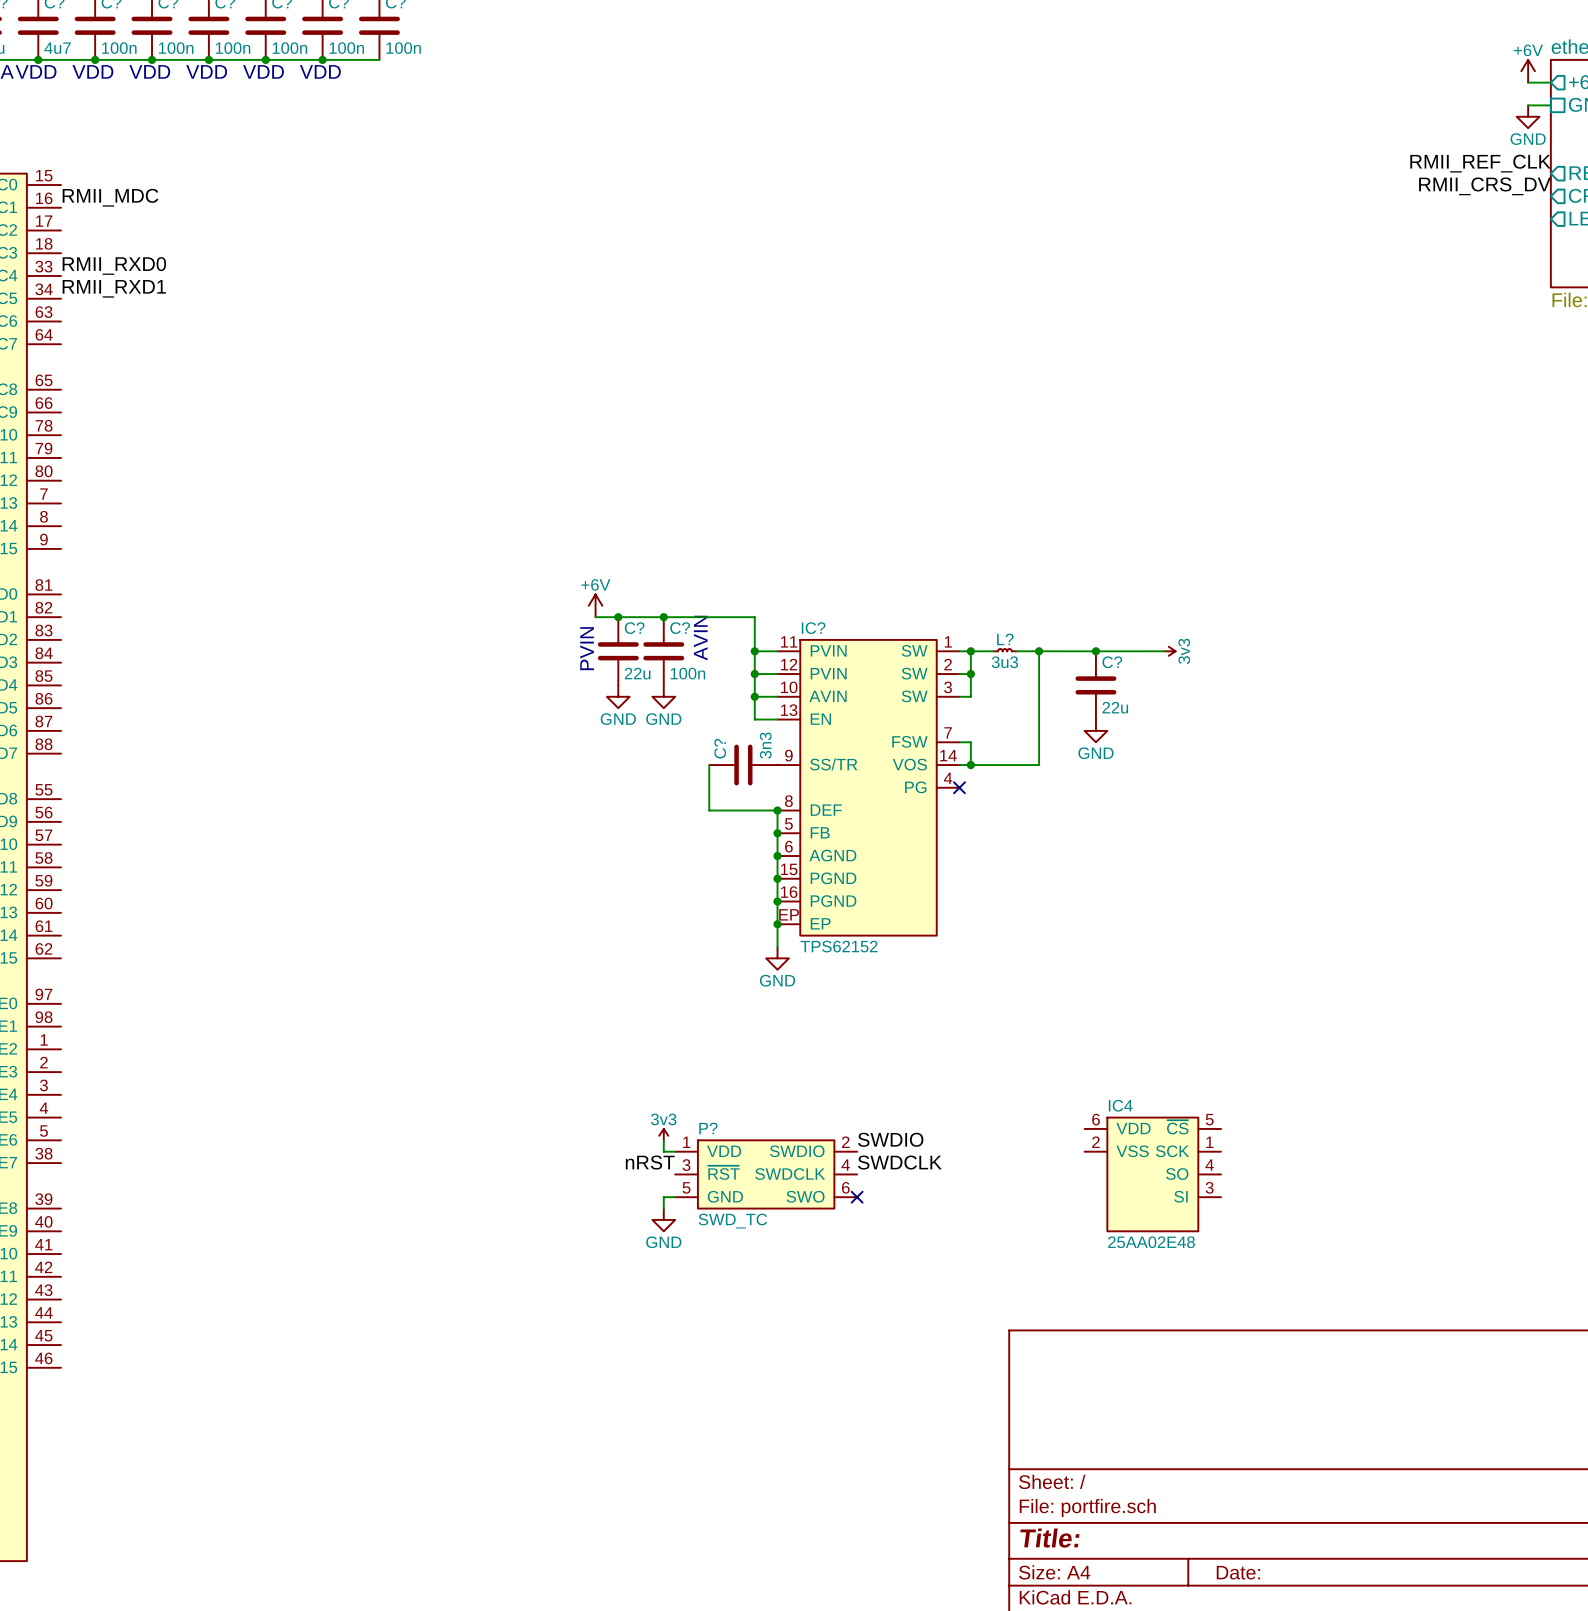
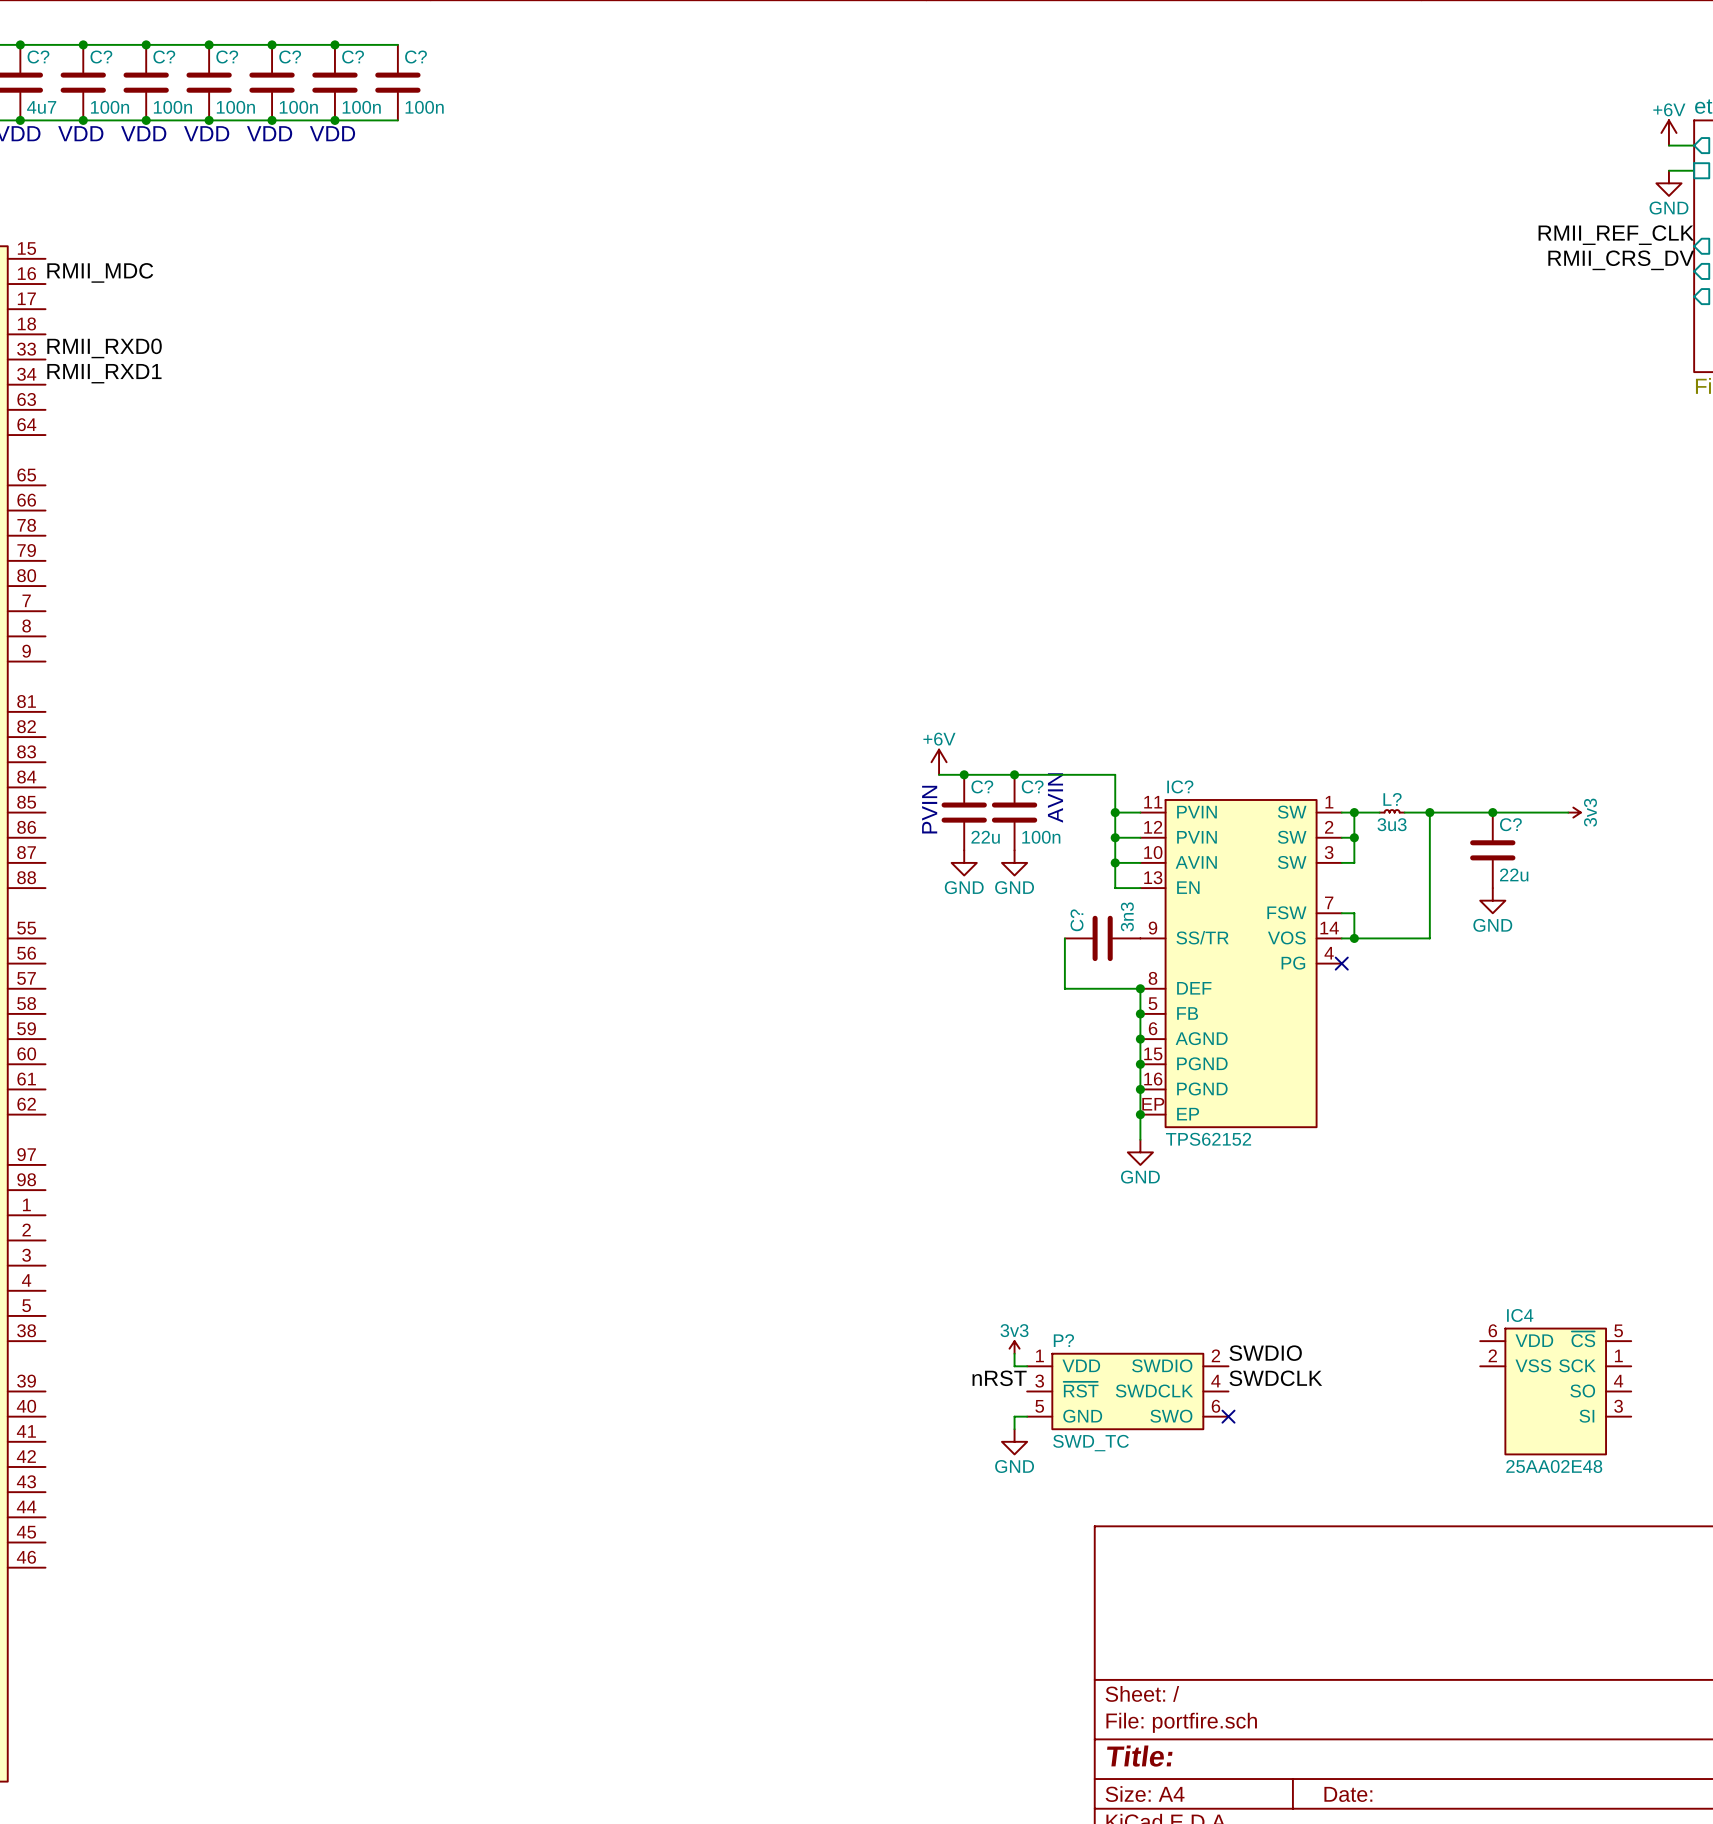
power symbol: +6V (595, 605) -> none
wire: (595, 617) (754, 617) (754, 719) (777, 719) -> none
junction: (618, 617) -> none
junction: (663, 617) -> none
text: AVIN (700, 638) -> none
power symbol: none -> +6V (939, 762)
text: PVIN (587, 648) -> none
L?: 3u3 (1004, 650) -> none
C?: 22u (618, 651) -> none
C?: 100n (663, 651) -> none
wire: (754, 651) (777, 651) -> none
junction: (754, 651) -> none
junction: none -> (964, 774)
junction: none -> (1014, 774)
wire: (970, 651) (970, 696) (959, 696) -> none
junction: (970, 651) -> none
wire: (1027, 651) (1164, 651) -> (1115, 774) (1115, 888) (1140, 888)
wire: (1039, 651) (1039, 765) (959, 765) -> none
junction: (1039, 651) -> none
junction: (1095, 651) -> none
power symbol: 3v3 (1169, 651) -> none
text: none -> AVIN (1055, 797)
wire: (754, 674) (777, 674) -> none
junction: (754, 674) -> none
wire: (959, 674) (970, 674) -> none
junction: (970, 674) -> none
text: none -> PVIN (929, 809)
L?: none -> 3u3 (1392, 811)
C?: none -> 22u (964, 812)
C?: none -> 100n (1014, 812)
wire: none -> (1115, 812) (1140, 812)
junction: none -> (1115, 812)
C?: 22u (1095, 685) -> none
wire: none -> (1341, 812) (1379, 812)
wire: none -> (1354, 812) (1354, 862) (1341, 862)
junction: none -> (1354, 812)
wire: none -> (1404, 812) (1568, 812)
wire: none -> (1429, 812) (1429, 938) (1341, 938)
junction: none -> (1429, 812)
junction: none -> (1492, 812)
power symbol: none -> 3v3 (1574, 812)
power symbol: GND (618, 696) -> none
power symbol: GND (663, 696) -> none
wire: (754, 696) (777, 696) -> none
junction: (754, 696) -> none
wire: none -> (1115, 837) (1140, 837)
junction: none -> (1115, 837)
wire: none -> (1341, 837) (1354, 837)
junction: none -> (1354, 837)
C?: none -> 22u (1492, 850)
power symbol: none -> GND (964, 862)
power symbol: none -> GND (1014, 862)
wire: none -> (1115, 862) (1140, 862)
junction: none -> (1115, 862)
power symbol: GND (1095, 730) -> none
wire: (959, 742) (970, 742) (970, 765) -> none
wire: (709, 765) (709, 810) (777, 810) (777, 946) -> none
C?: 3n3 (743, 765) -> none
junction: (970, 765) -> none
power symbol: none -> GND (1492, 900)
wire: none -> (1341, 913) (1354, 913) (1354, 938)
IC?: TPS62152 (868, 787) -> none
no-connect mark: (959, 787) -> none
wire: none -> (1064, 938) (1064, 988) (1140, 988) (1140, 1139)
C?: none -> 3n3 (1102, 938)
junction: none -> (1354, 938)
junction: (777, 810) -> none
IC?: none -> TPS62152 (1241, 963)
no-connect mark: none -> (1341, 963)
junction: (777, 833) -> none
junction: none -> (1140, 988)
junction: (777, 856) -> none
junction: none -> (1140, 1013)
junction: (777, 878) -> none
junction: none -> (1140, 1039)
junction: (777, 901) -> none
junction: none -> (1140, 1064)
junction: (777, 924) -> none
junction: none -> (1140, 1089)
power symbol: GND (777, 958) -> none
junction: none -> (1140, 1114)
power symbol: none -> GND (1140, 1152)
power symbol: 3v3 (663, 1134) -> none
label: SWDIO (890, 1139) -> none
wire: (663, 1140) (663, 1151) (675, 1151) -> none
label: nRST (650, 1162) -> none
label: SWDCLK (899, 1162) -> none
power symbol: none -> 3v3 (1014, 1347)
label: none -> SWDIO (1265, 1353)
P?: SWD_TC (766, 1174) -> none
wire: none -> (1014, 1353) (1014, 1366) (1027, 1366)
IC4 position: (1152, 1174) -> (1555, 1391)
label: none -> nRST (999, 1378)
label: none -> SWDCLK (1275, 1378)
wire: (675, 1197) (663, 1197) (663, 1208) -> none
no-connect mark: (857, 1197) -> none
P?: none -> SWD_TC (1127, 1391)
power symbol: GND (663, 1219) -> none
wire: none -> (1027, 1416) (1014, 1416) (1014, 1429)
no-connect mark: none -> (1228, 1416)
power symbol: none -> GND (1014, 1441)

